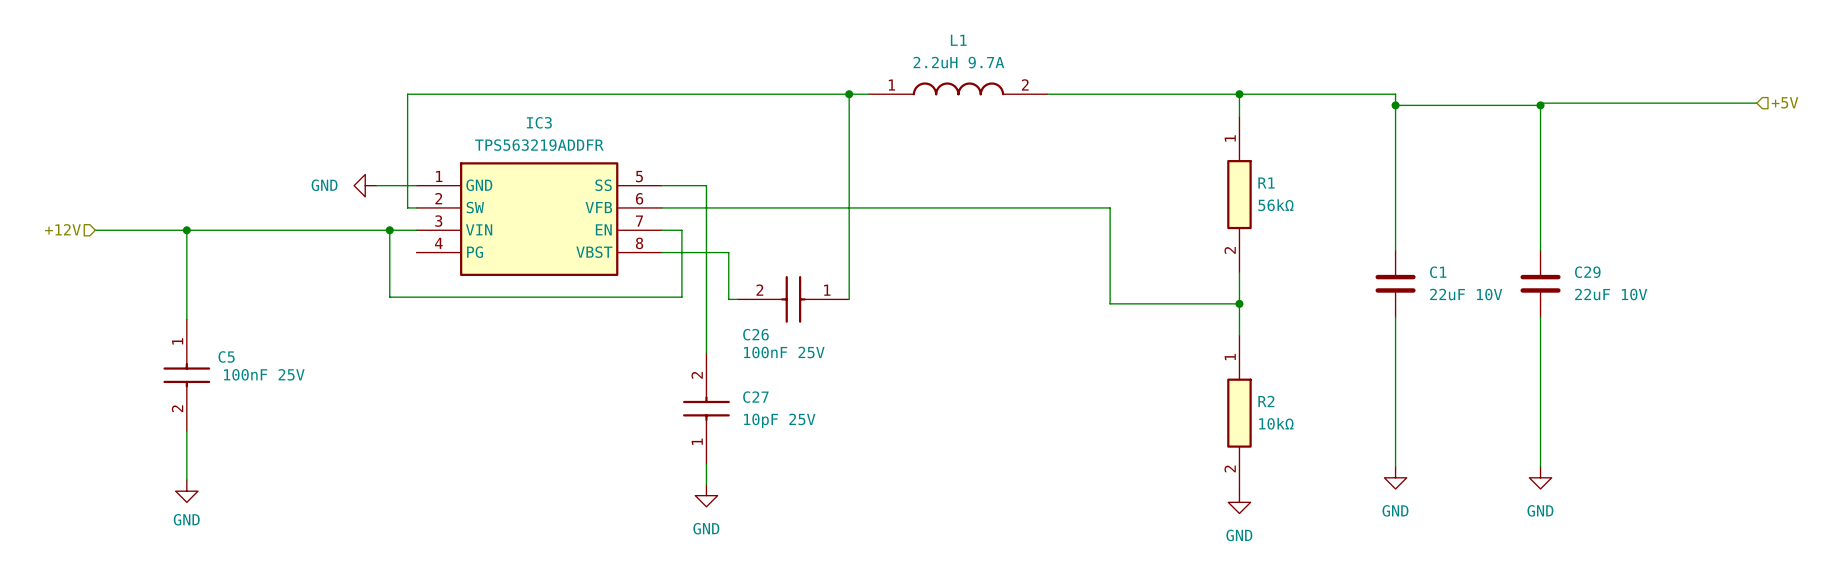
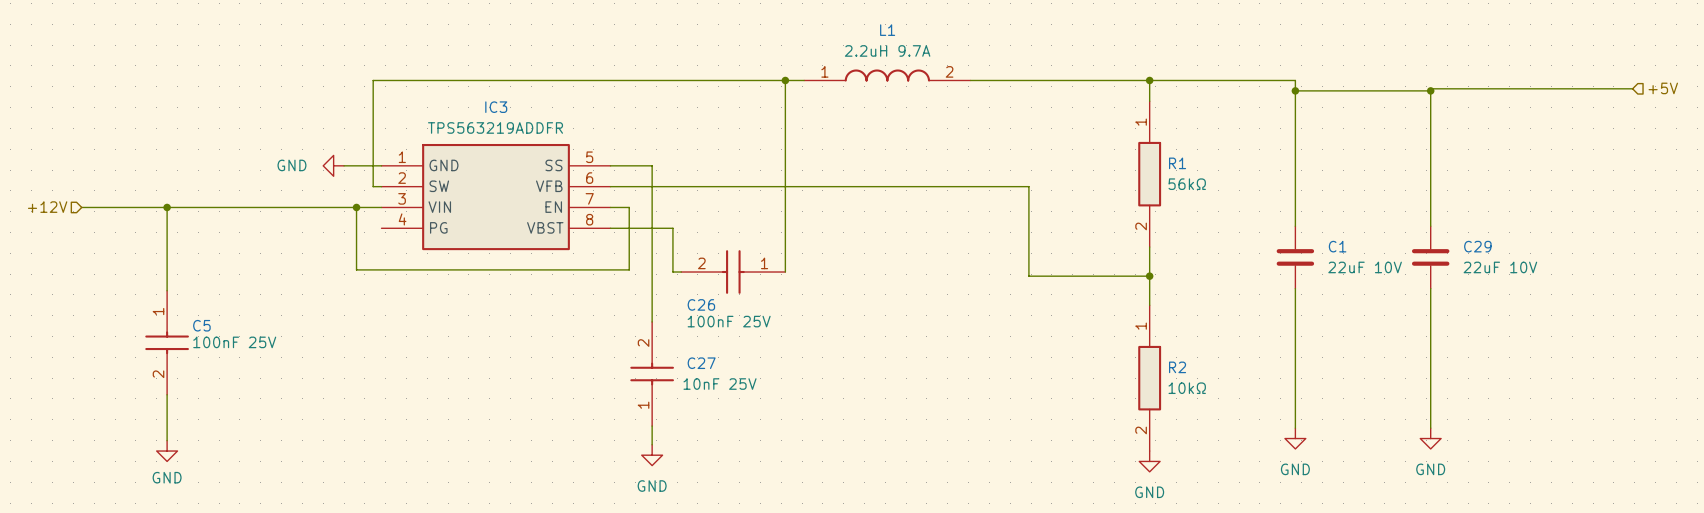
C27 value: 10pF 25V (779, 420) -> 10nF 25V (720, 384)

